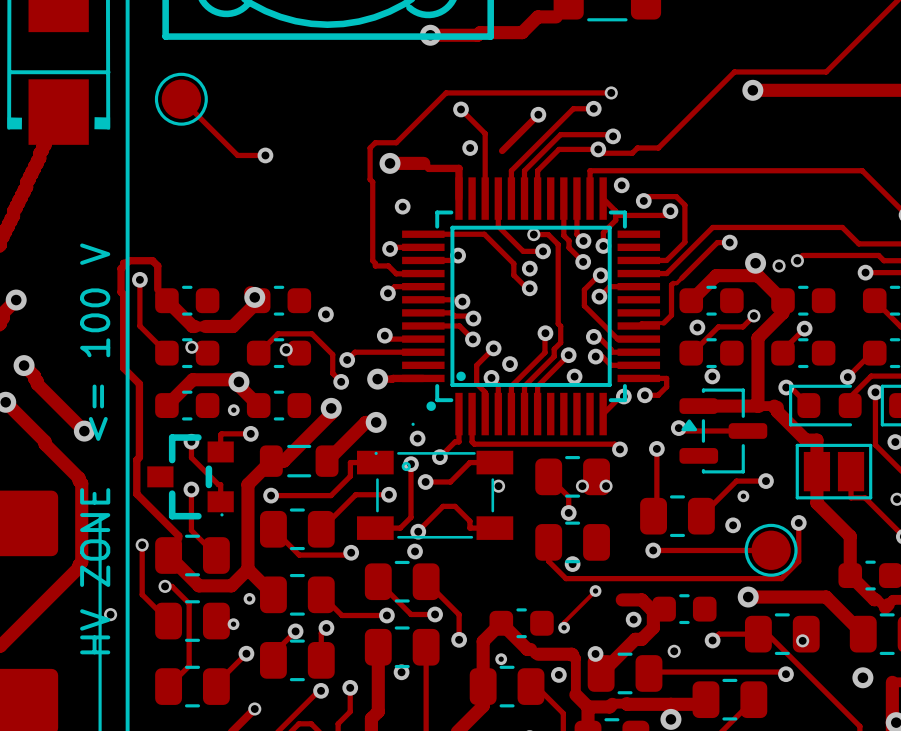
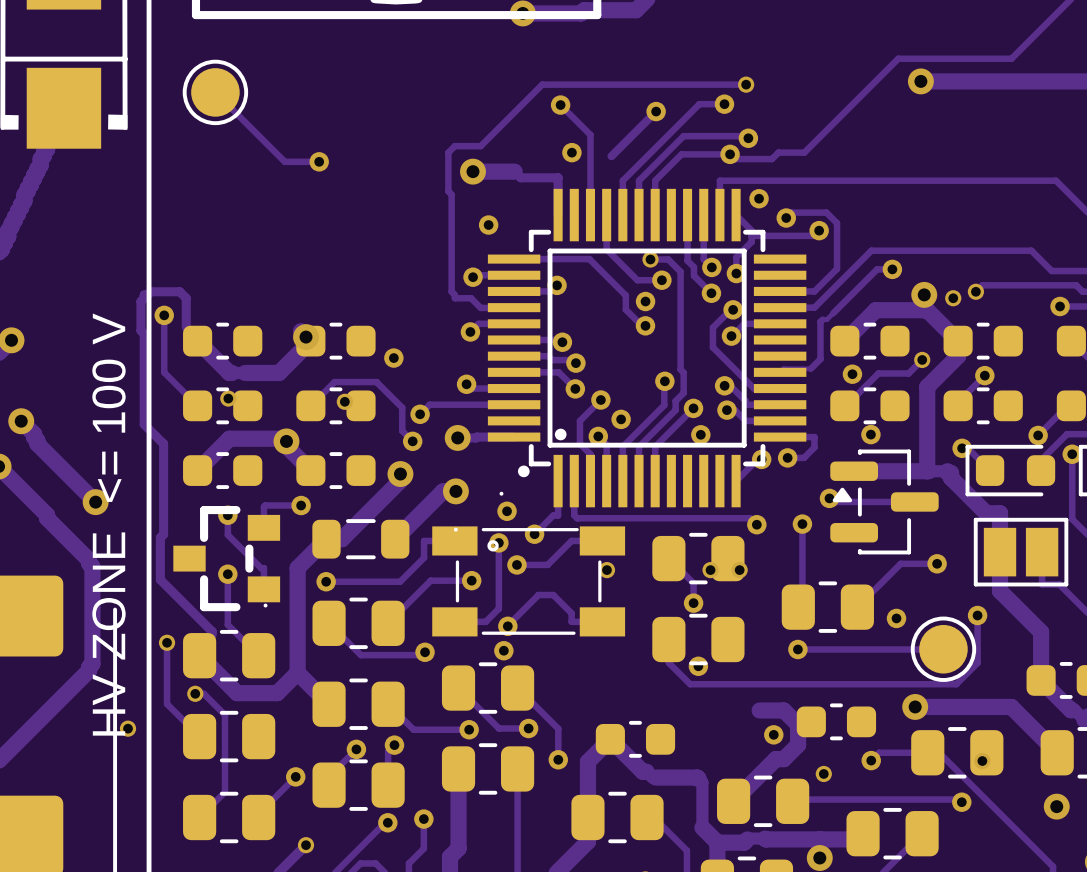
via: (233, 410) -> none
via: (743, 496) -> none
track: (595, 591) (564, 622) (564, 627) -> none
via: (595, 591) -> none
via: (249, 598) -> none
via: (233, 624) -> none
via: (564, 627) -> none
via: (595, 653) -> none
via: (501, 659) -> none
via: (401, 672) -> none
via: (558, 674) -> none

